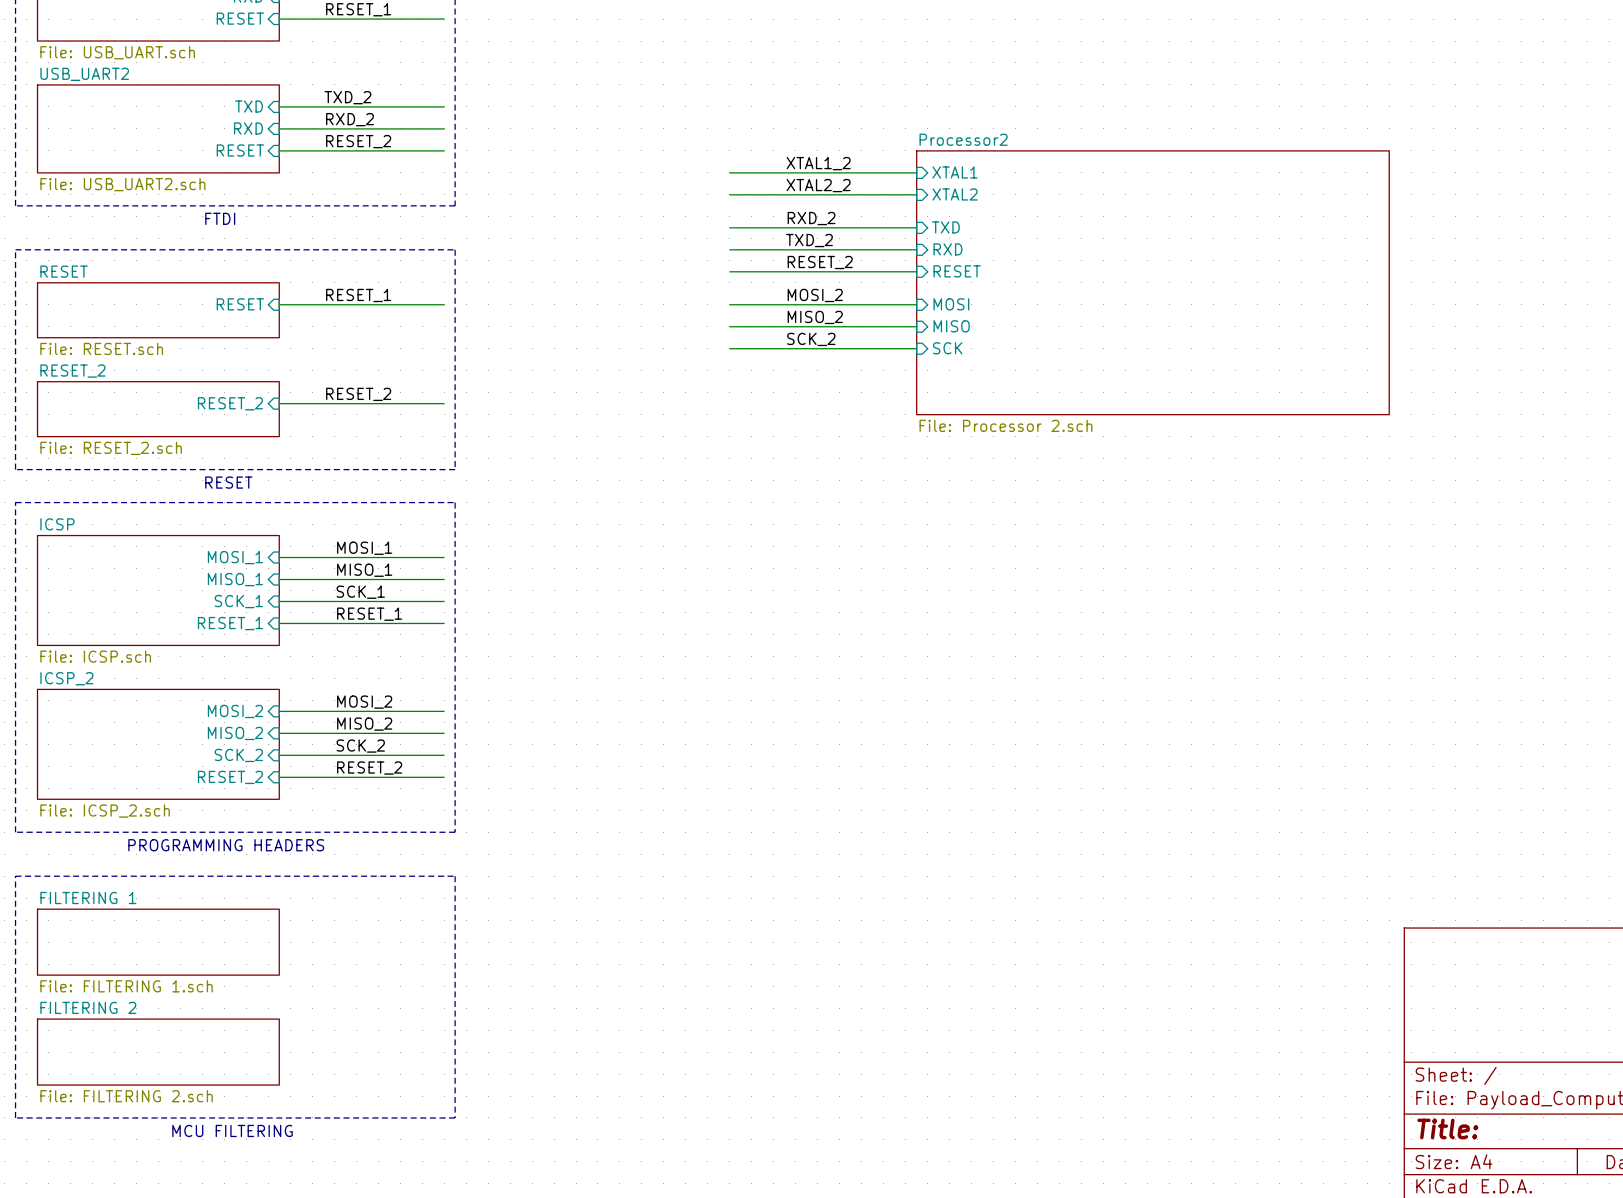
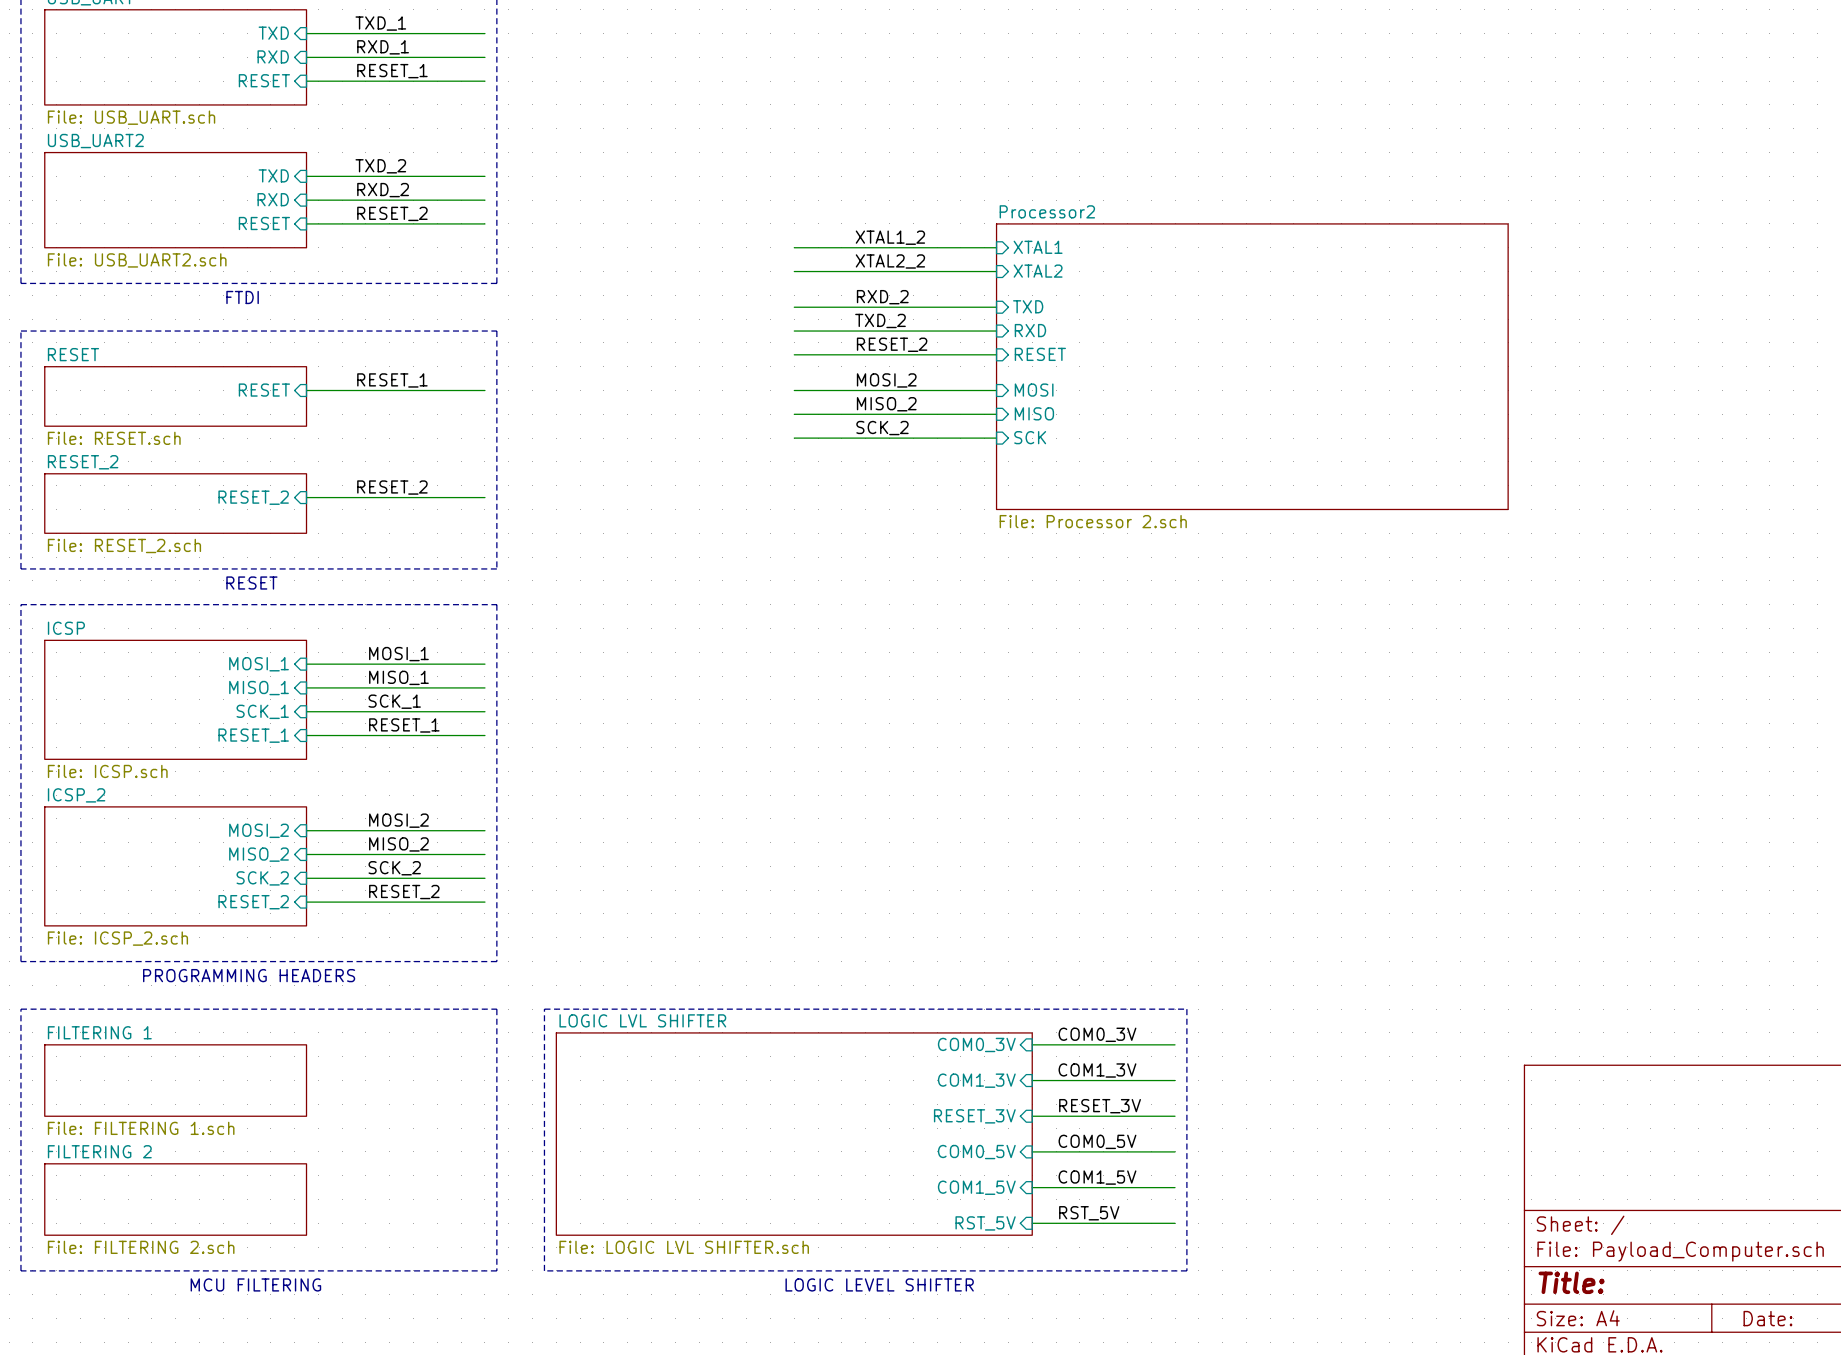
line: none -> (544, 1009) (544, 1270) (1186, 1270) (1186, 1009) (544, 1009)
label: none -> COM0_3V (1097, 1034)
sheet pin: none -> COM0_3V (976, 1044)
wire: none -> (1032, 1044) (1175, 1044)
label: none -> COM1_3V (1097, 1070)
sheet pin: none -> COM1_3V (976, 1080)
wire: none -> (1032, 1080) (1175, 1080)
label: none -> RESET_3V (1100, 1106)
sheet pin: none -> RESET_3V (974, 1116)
wire: none -> (1032, 1116) (1175, 1116)
sheet LOGIC LVL SHIFTER: none -> File: LOGIC LVL SHIFTER.sch (794, 1134)
label: none -> COM0_5V (1097, 1141)
sheet pin: none -> COM0_5V (976, 1152)
wire: none -> (1032, 1151) (1175, 1151)
label: none -> COM1_5V (1097, 1177)
sheet pin: none -> COM1_5V (976, 1187)
wire: none -> (1032, 1187) (1175, 1187)
label: none -> RST_5V (1089, 1213)
sheet pin: none -> RST_5V (985, 1223)
wire: none -> (1032, 1223) (1175, 1223)
text: none -> LOGIC LEVEL SHIFTER (879, 1284)

